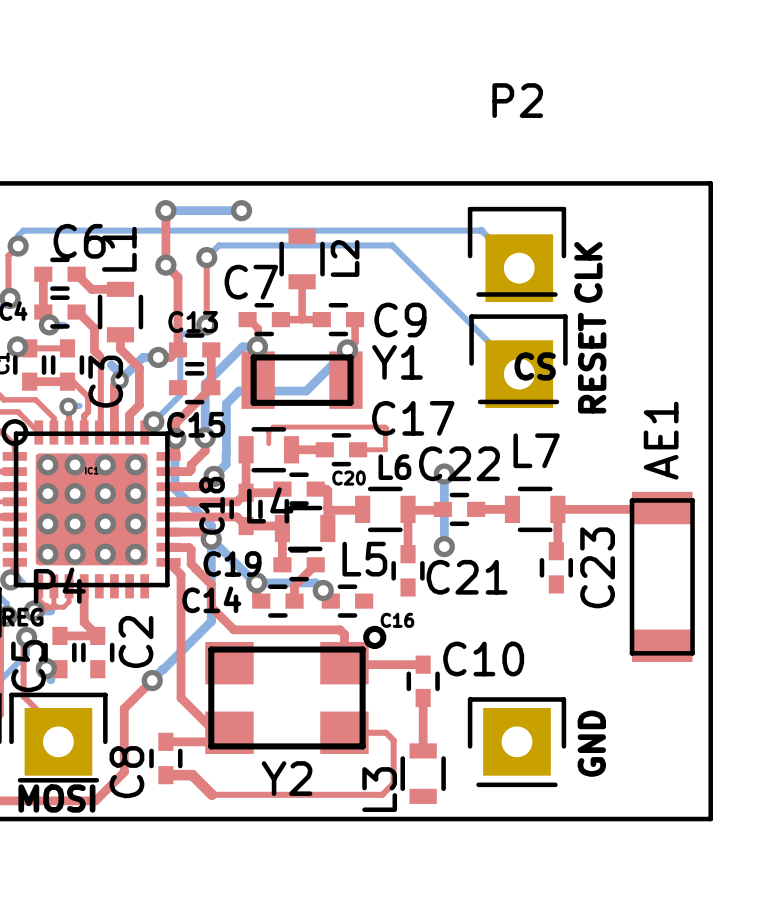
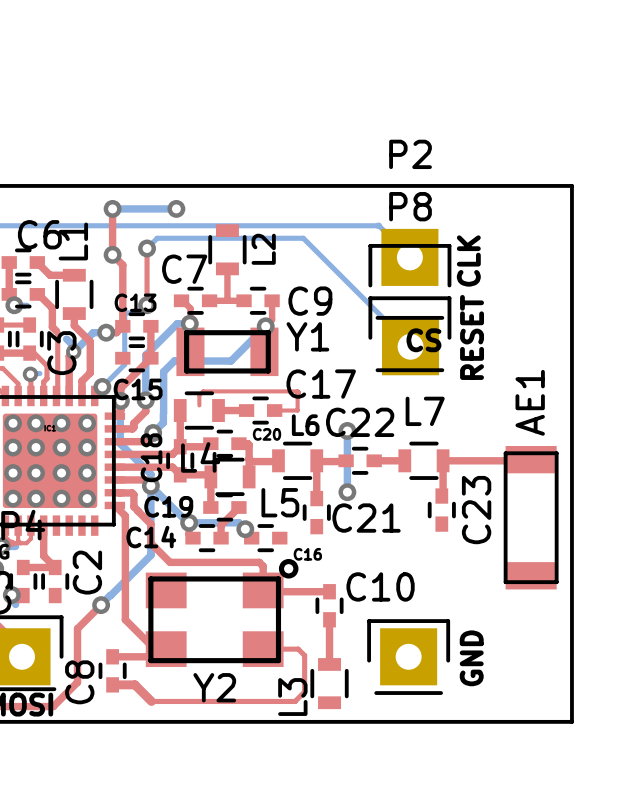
P2 footprint: [467, 206, 567, 302] -> [368, 228, 452, 320]
P8 name: none -> P8 (410, 206)

